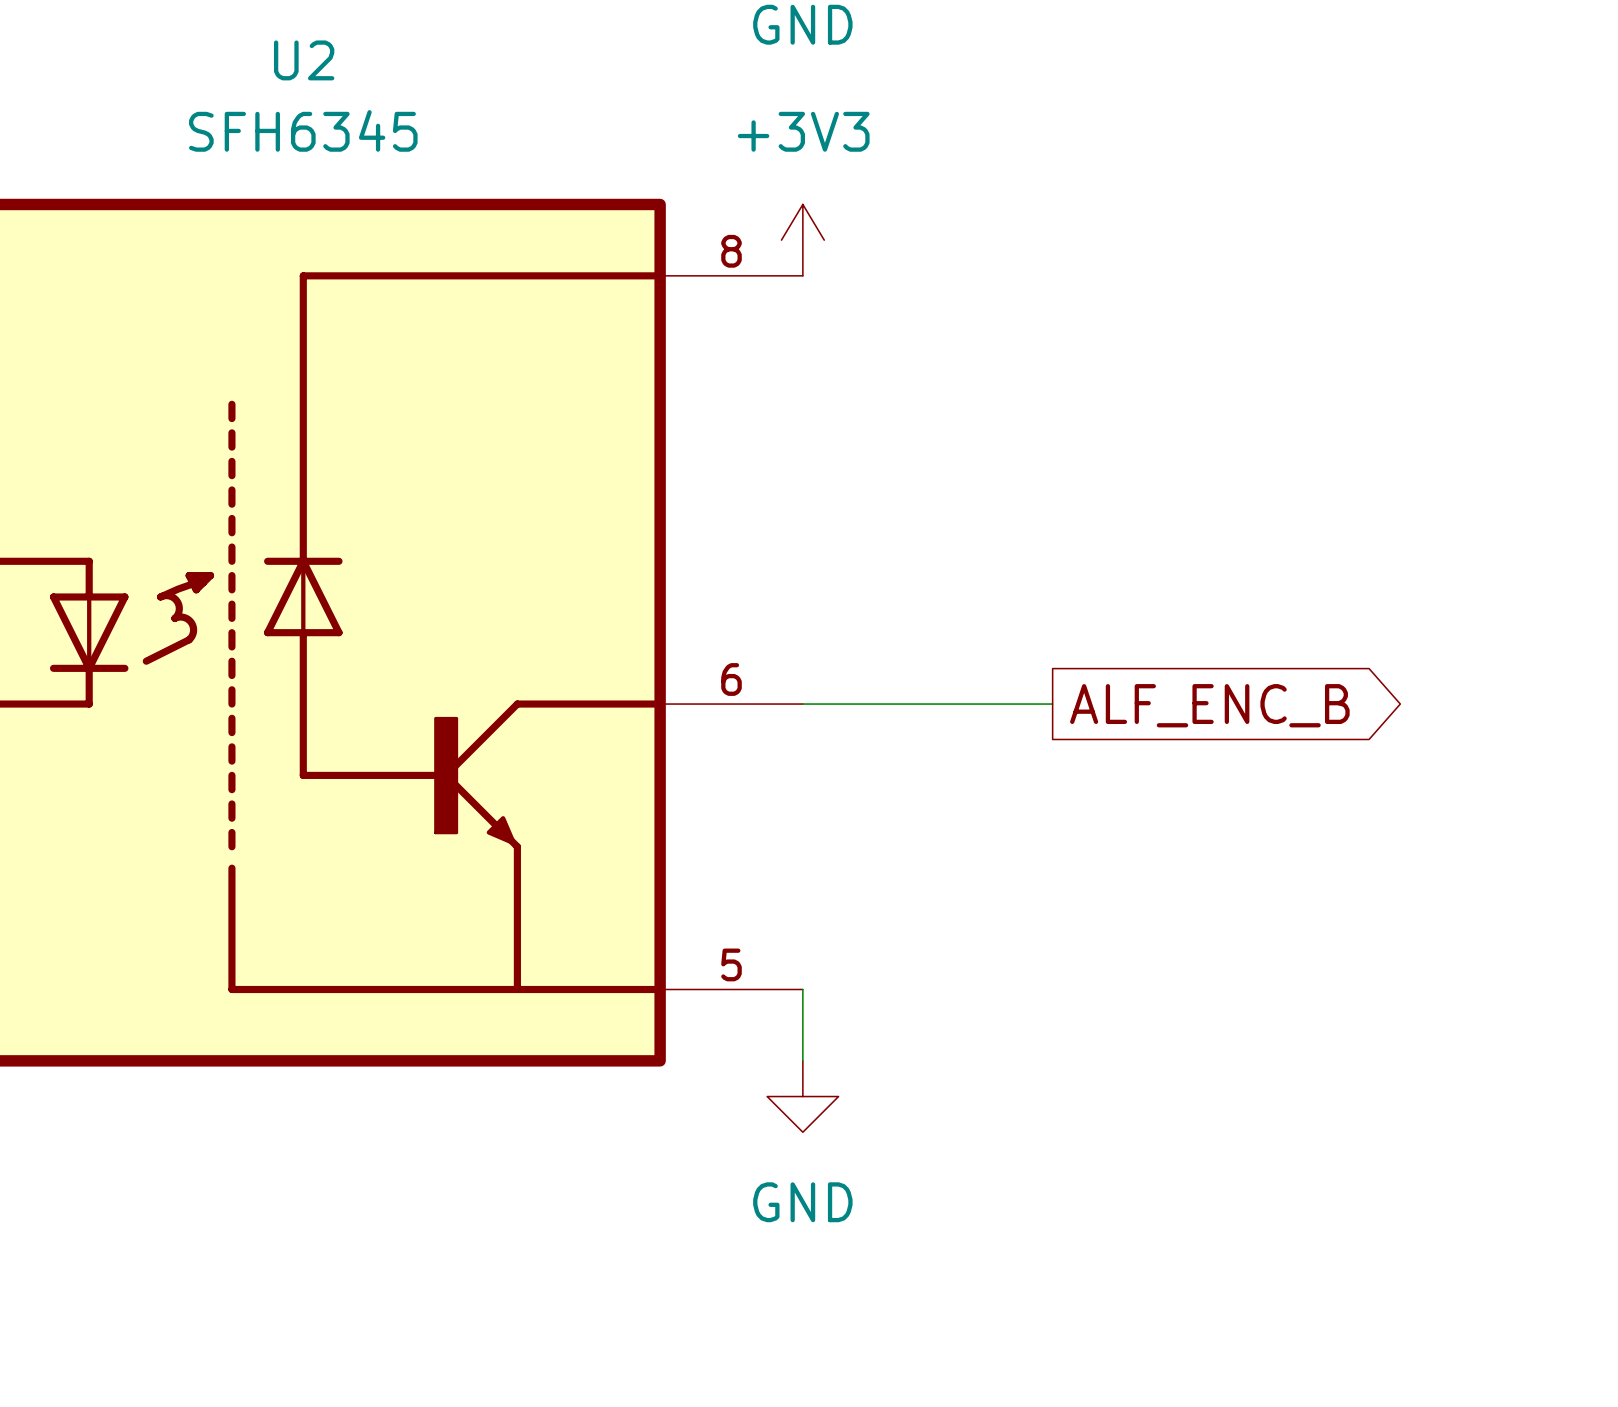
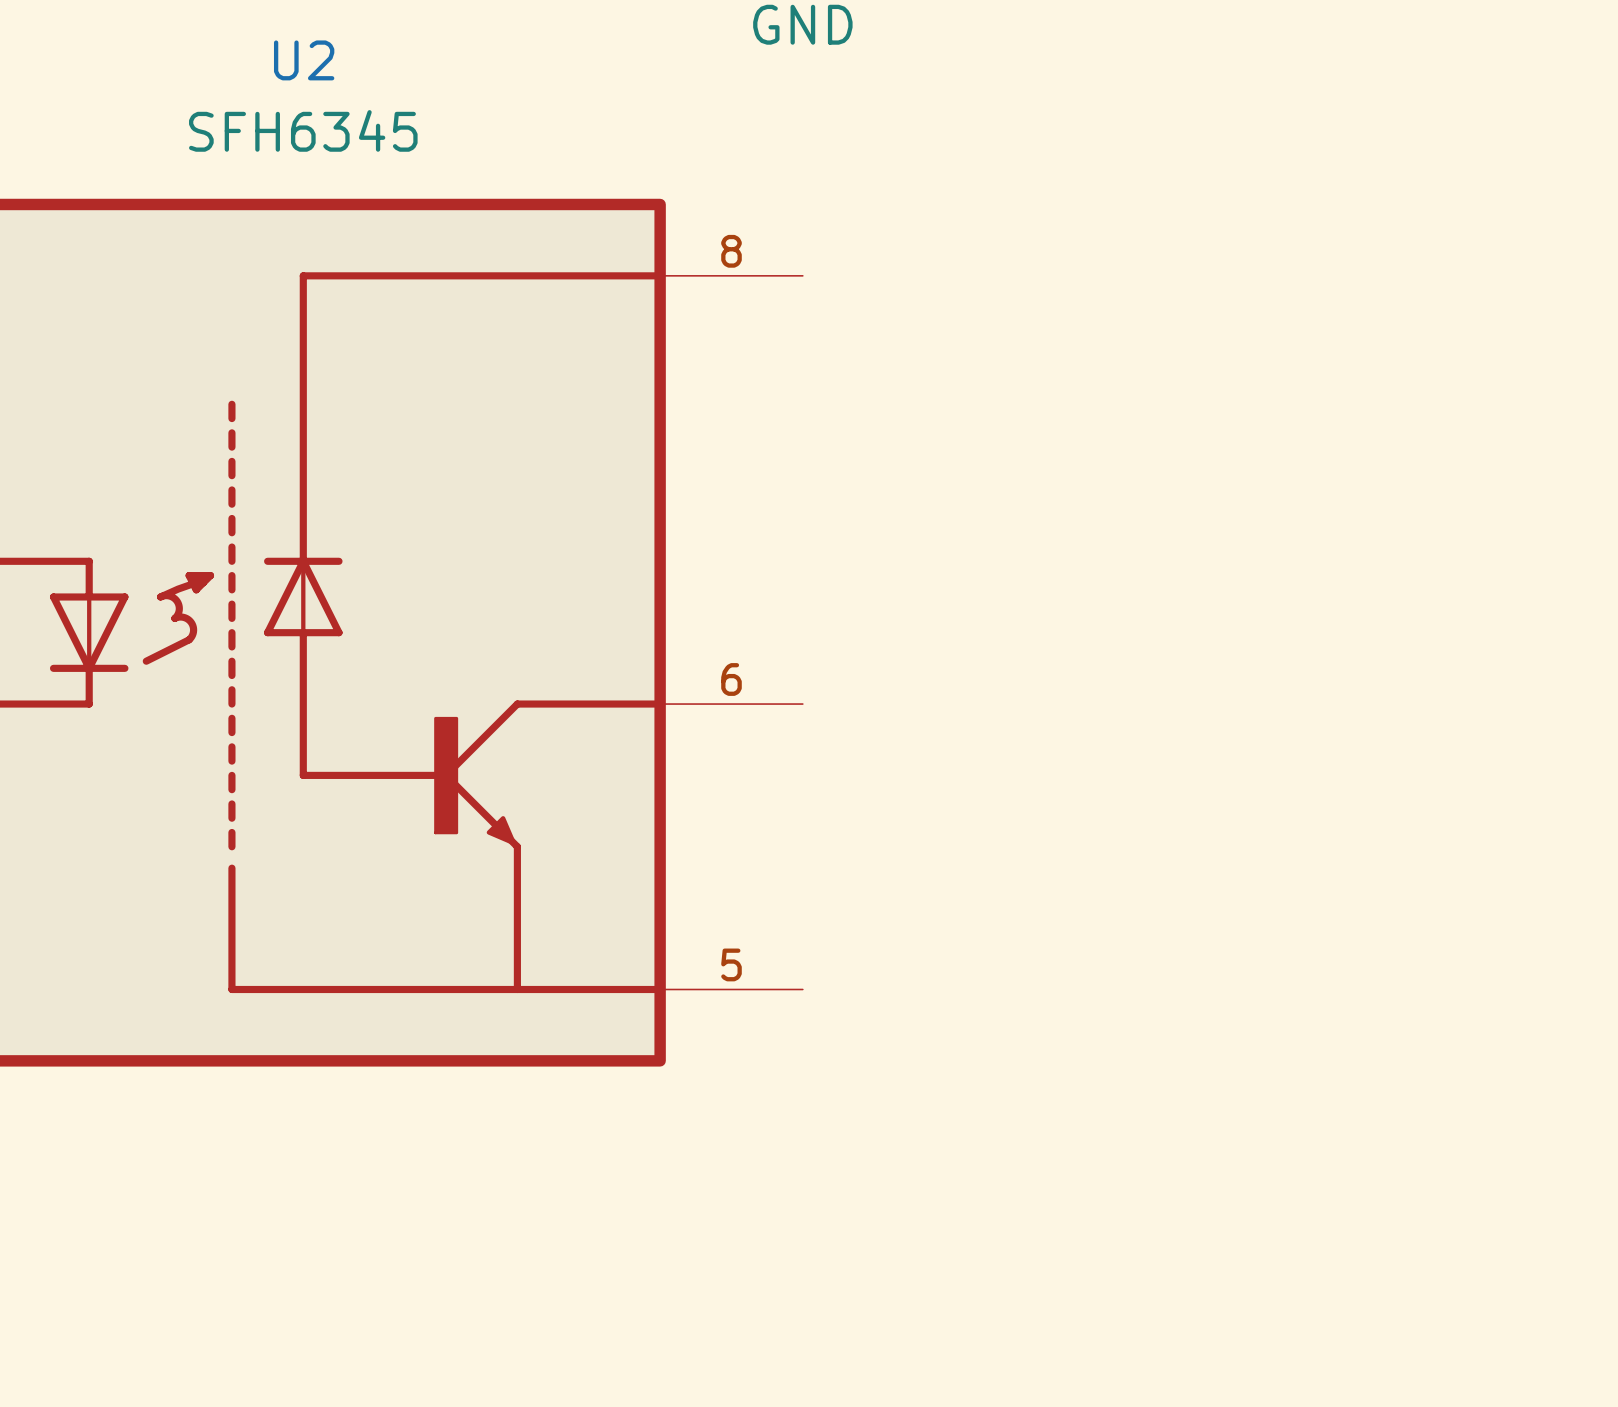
power symbol: +3V3 (802, 240) -> none
wire: (802, 704) (1052, 704) -> none
global label: ALF_ENC_B (1209, 705) -> none
wire: (802, 989) (802, 1060) -> none
power symbol: GND (802, 1096) -> none

